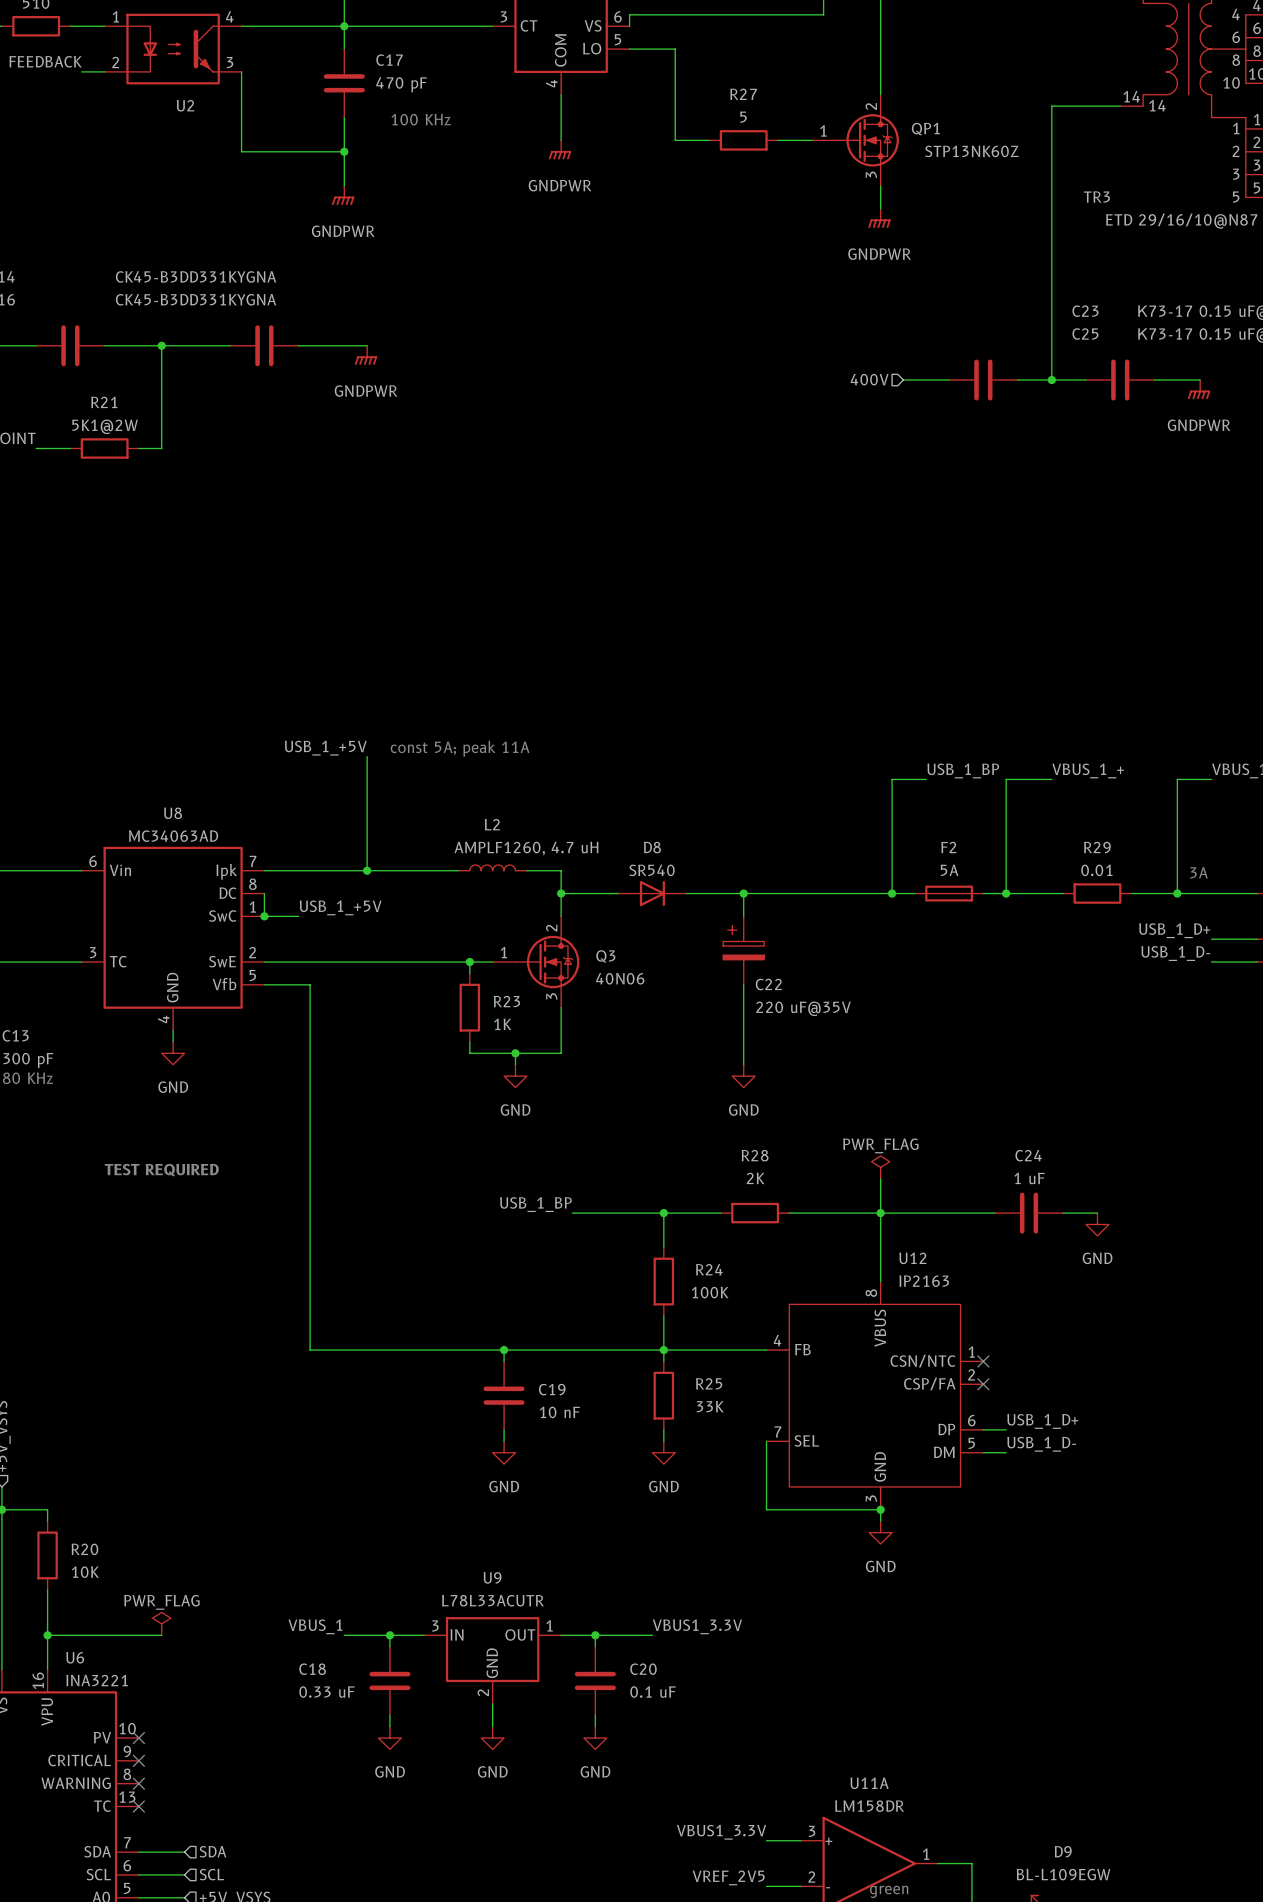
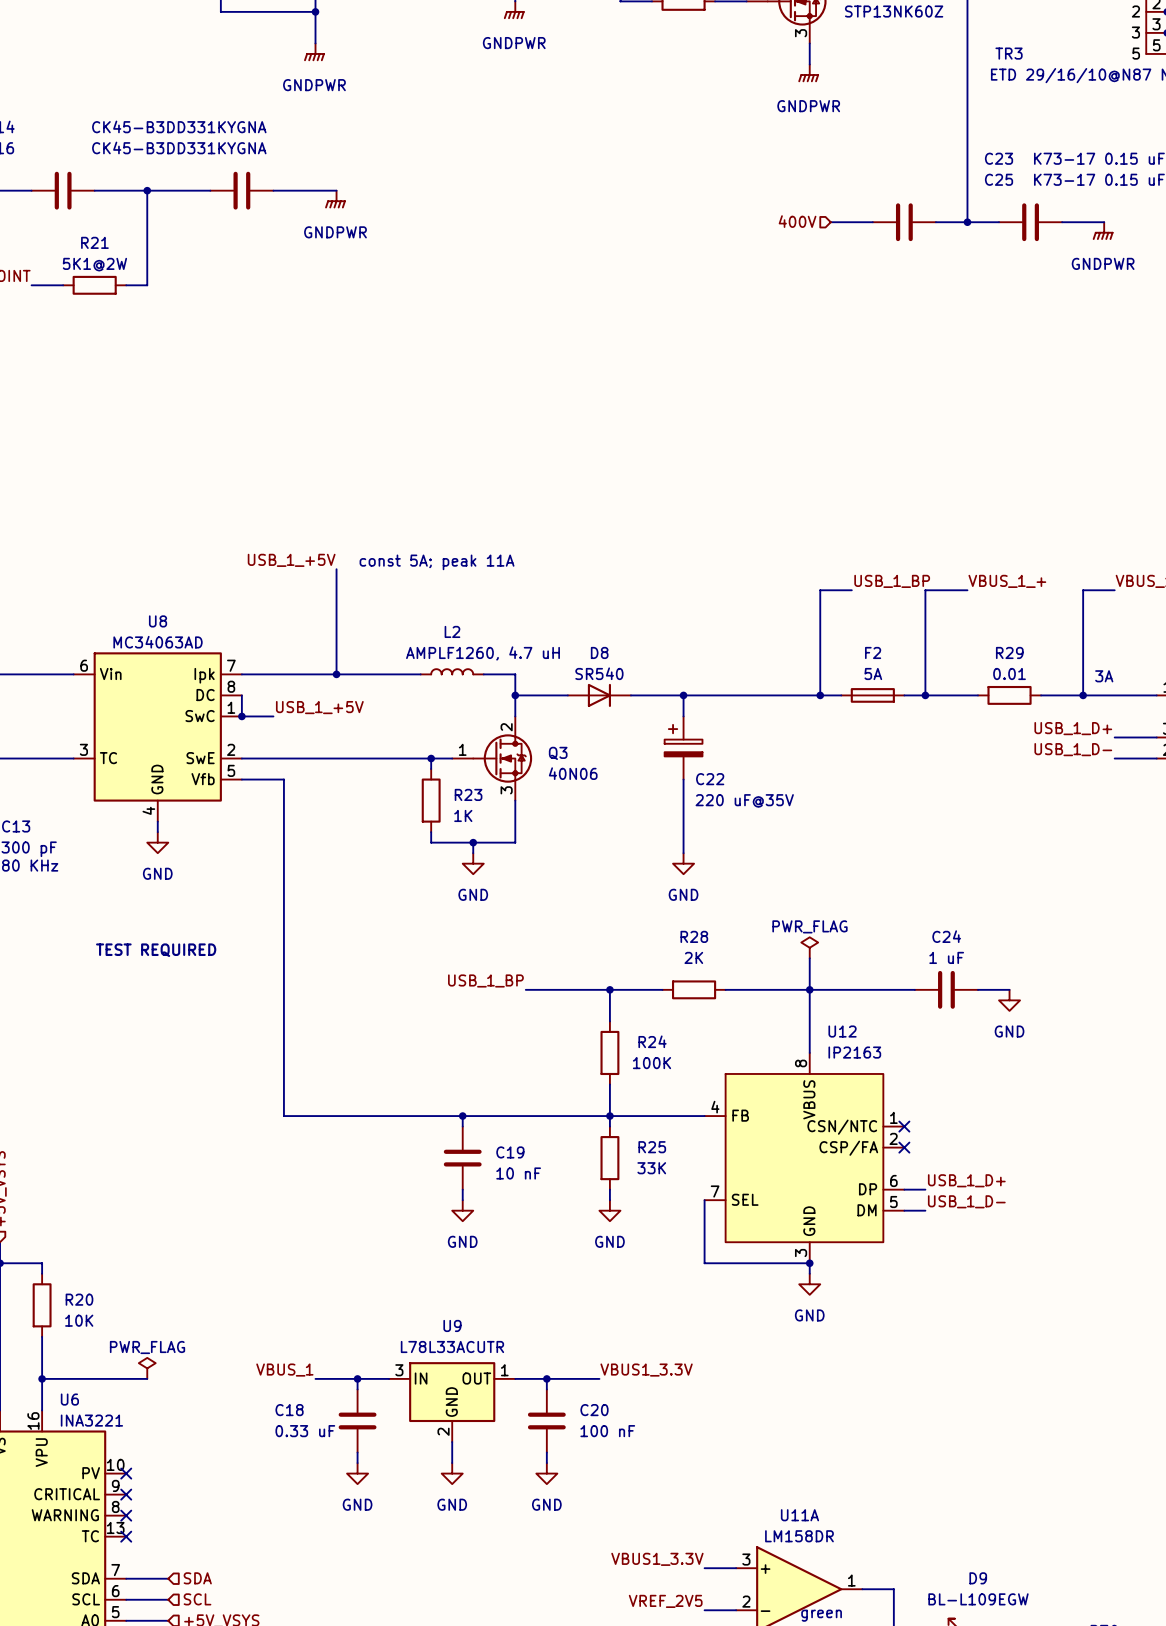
C20 value: 0.1 uF (653, 1692) -> 100 nF (607, 1431)

